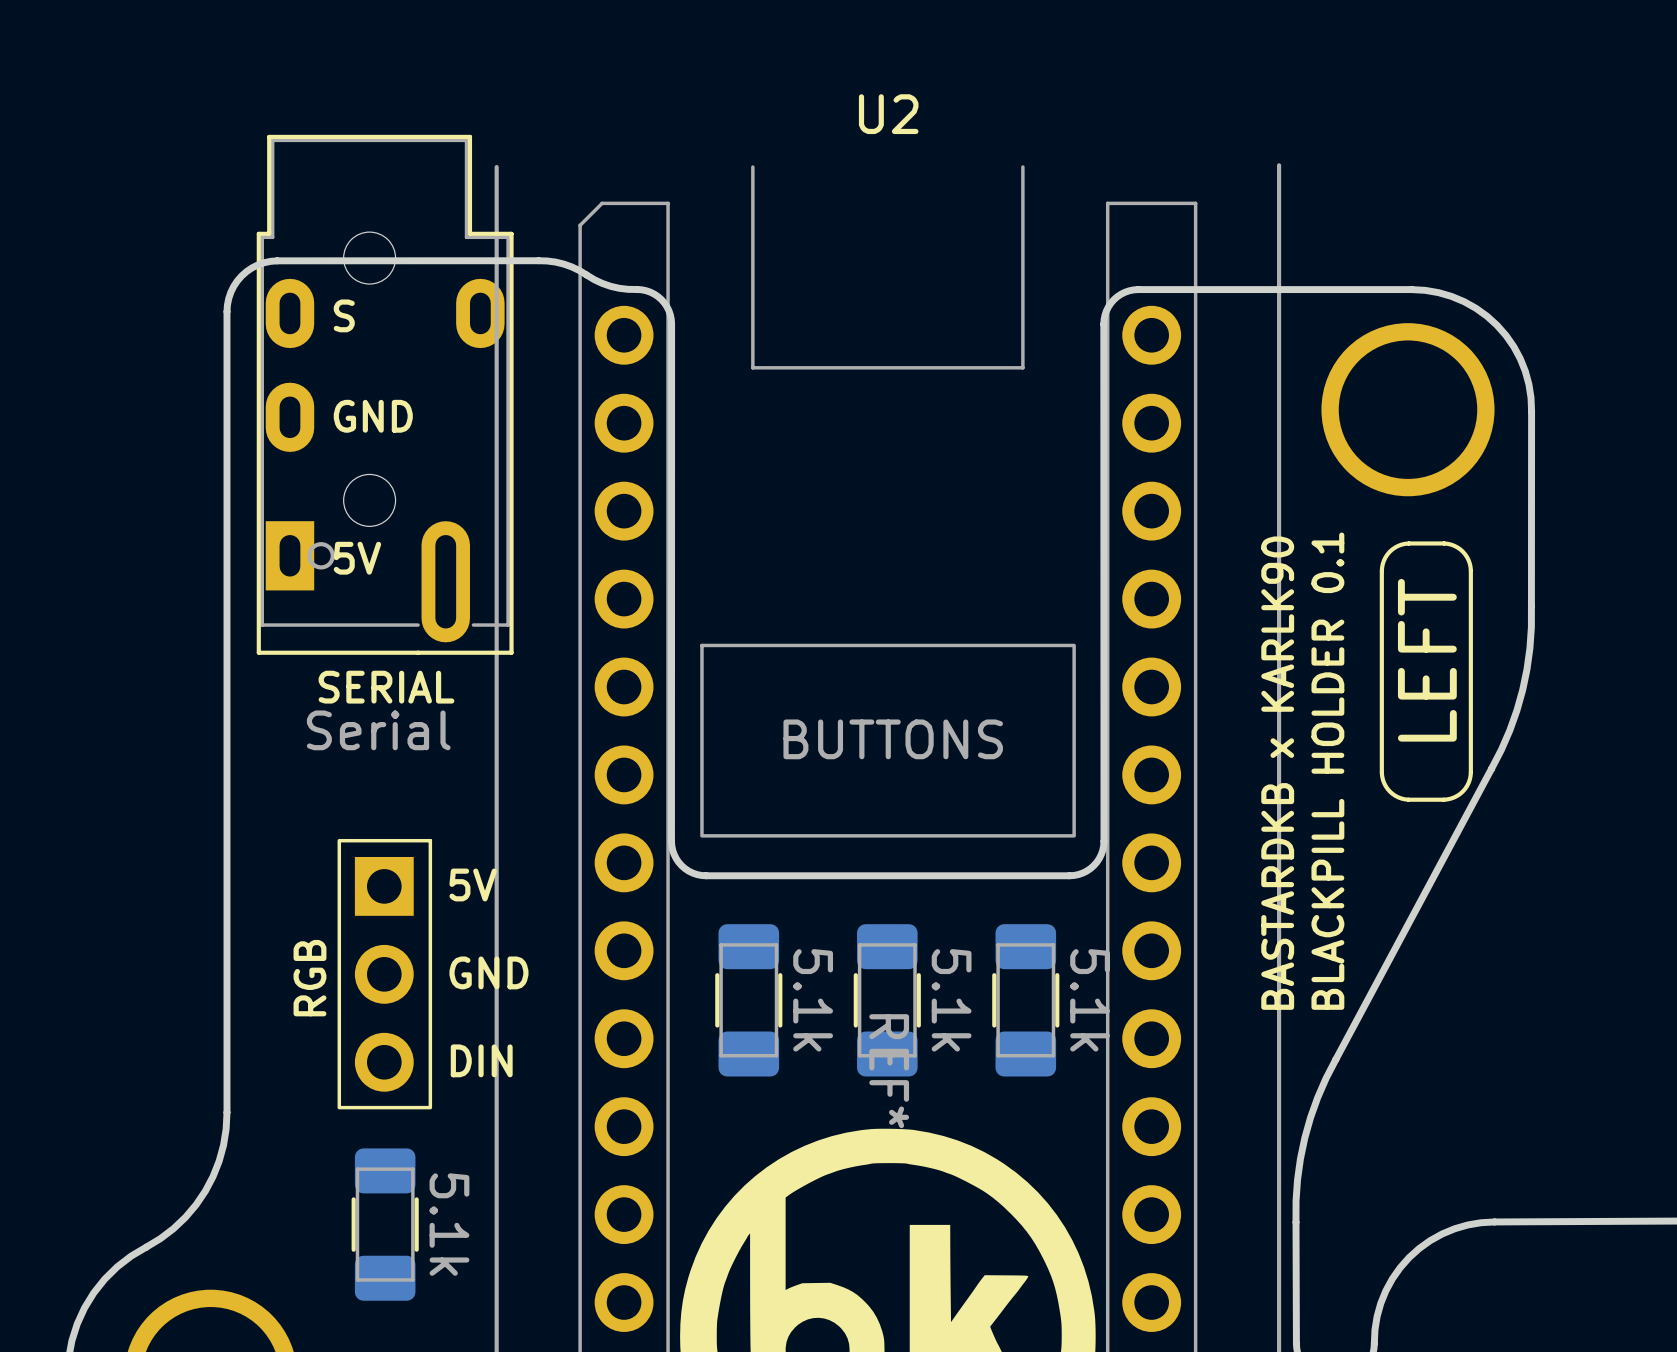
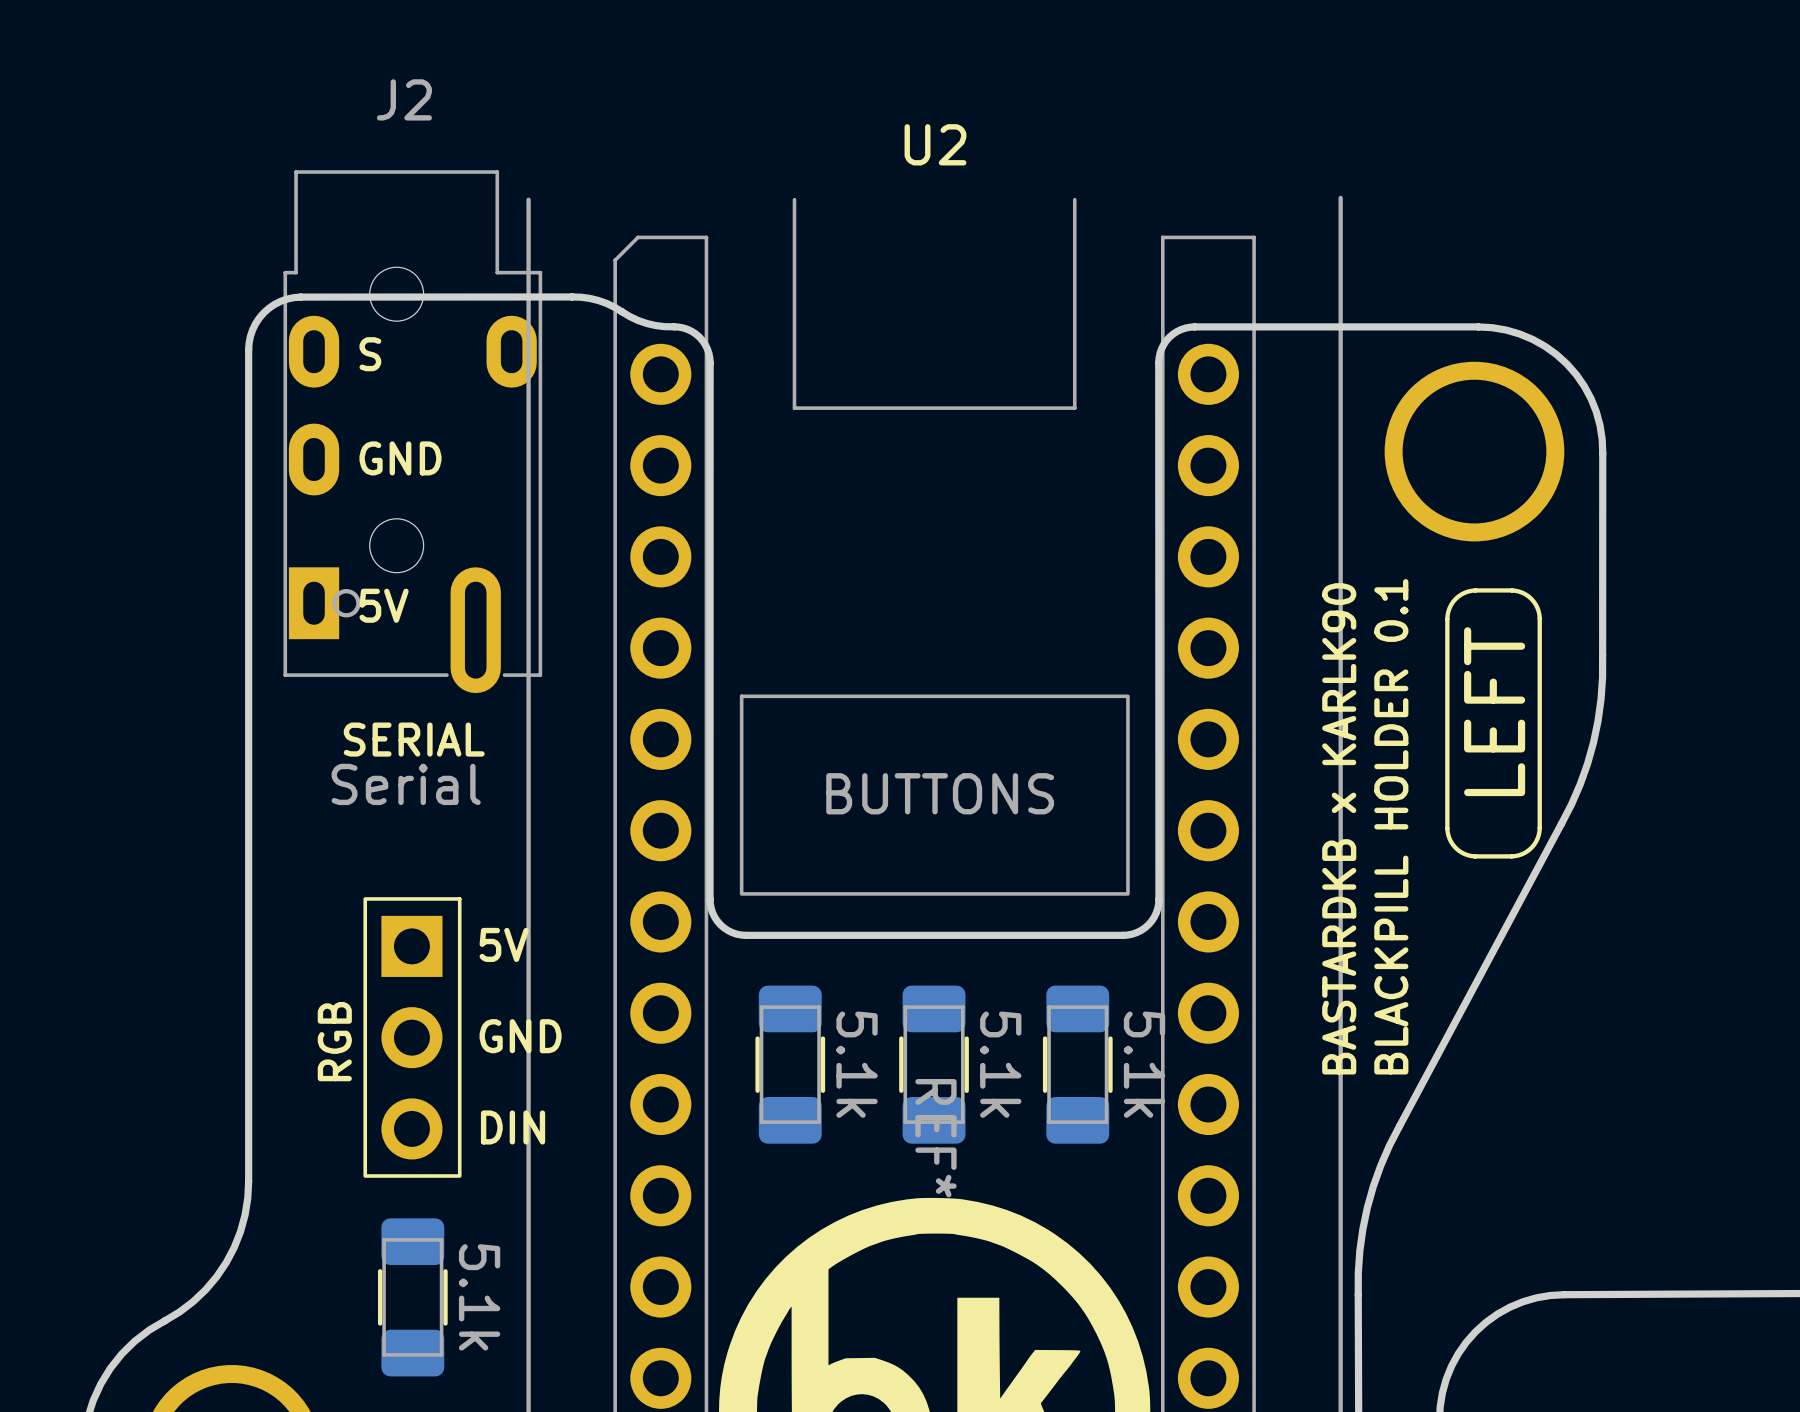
J2: none -> Serial (412, 431)
part: Serial (385, 394) -> none

